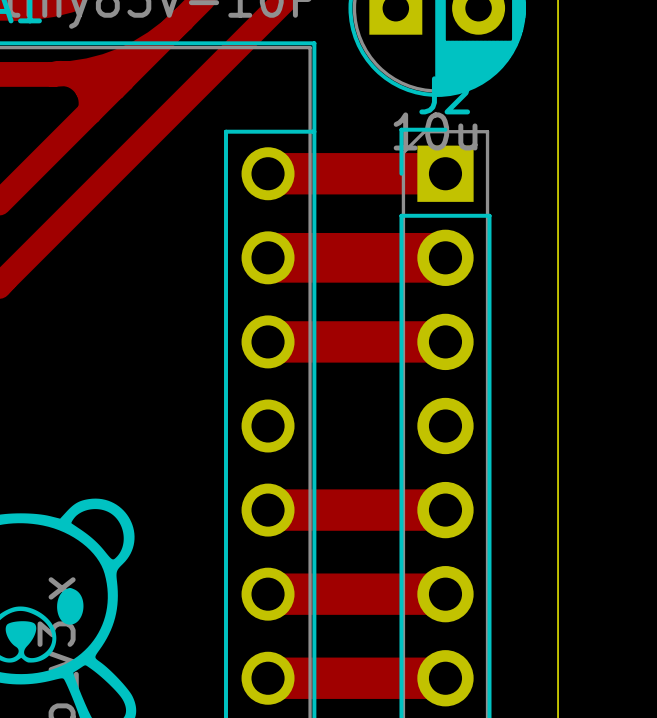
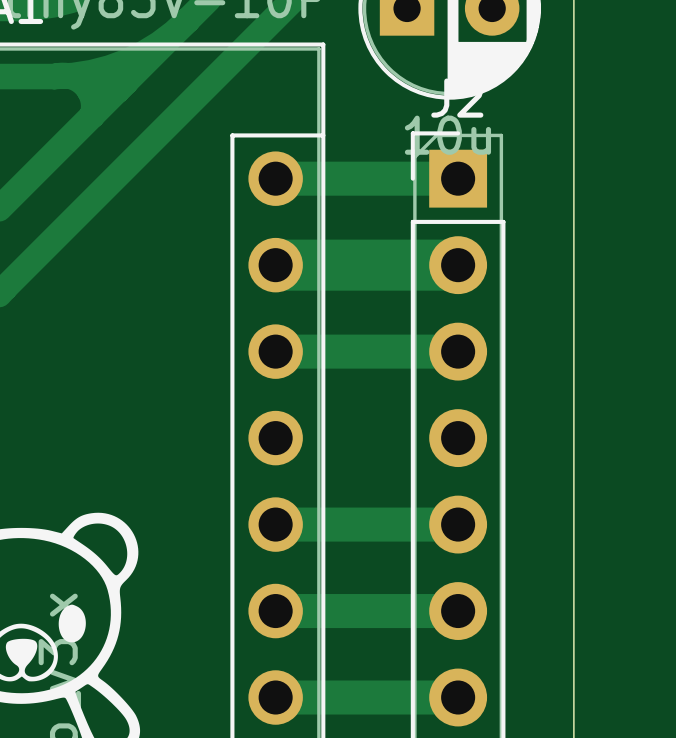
track width: thick (268, 173) (445, 173) -> thin (275, 178) (458, 178)
track width: thick (268, 341) (445, 341) -> thin (275, 351) (458, 351)
track width: thick (268, 510) (445, 510) -> thin (275, 524) (458, 524)
track width: thick (268, 594) (445, 594) -> thin (275, 611) (458, 611)
track width: thick (268, 678) (445, 678) -> thin (275, 697) (458, 697)

